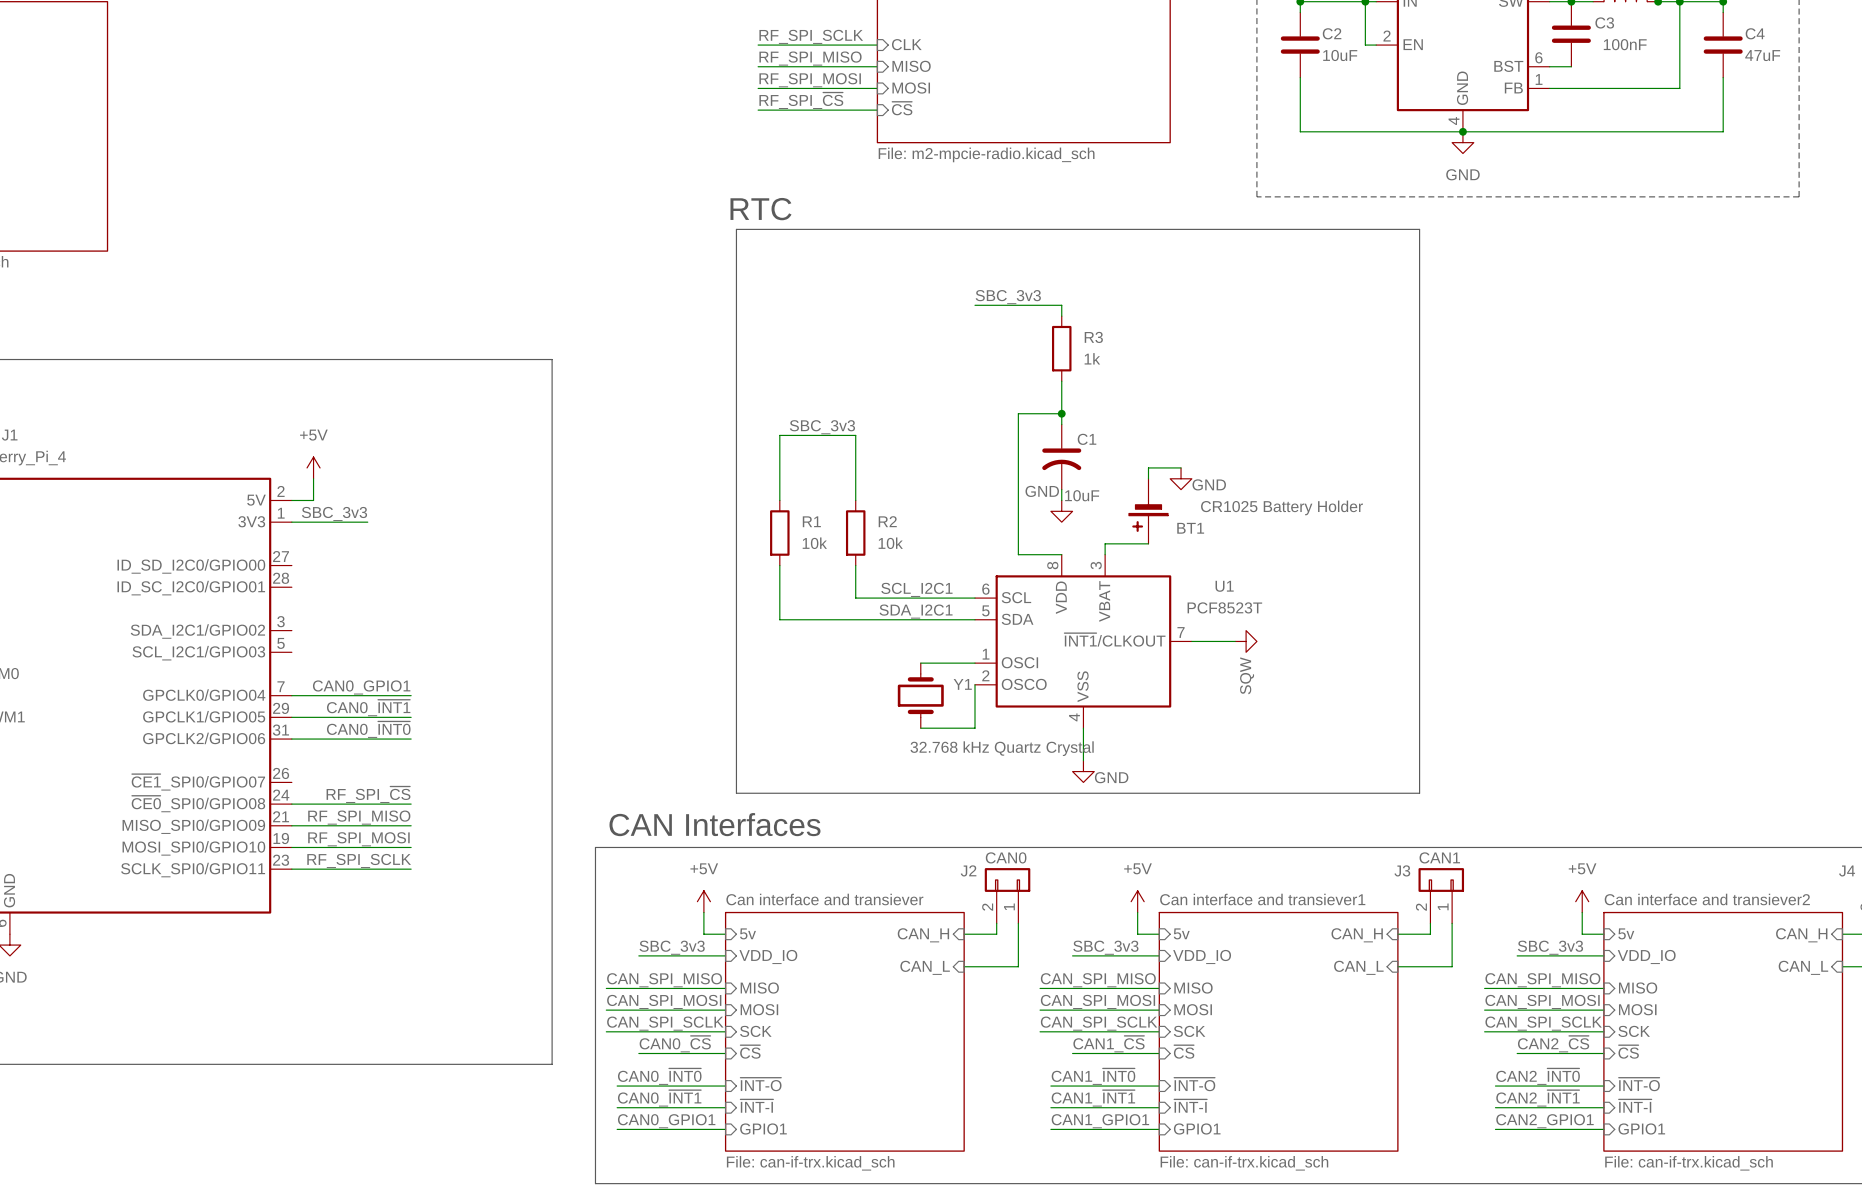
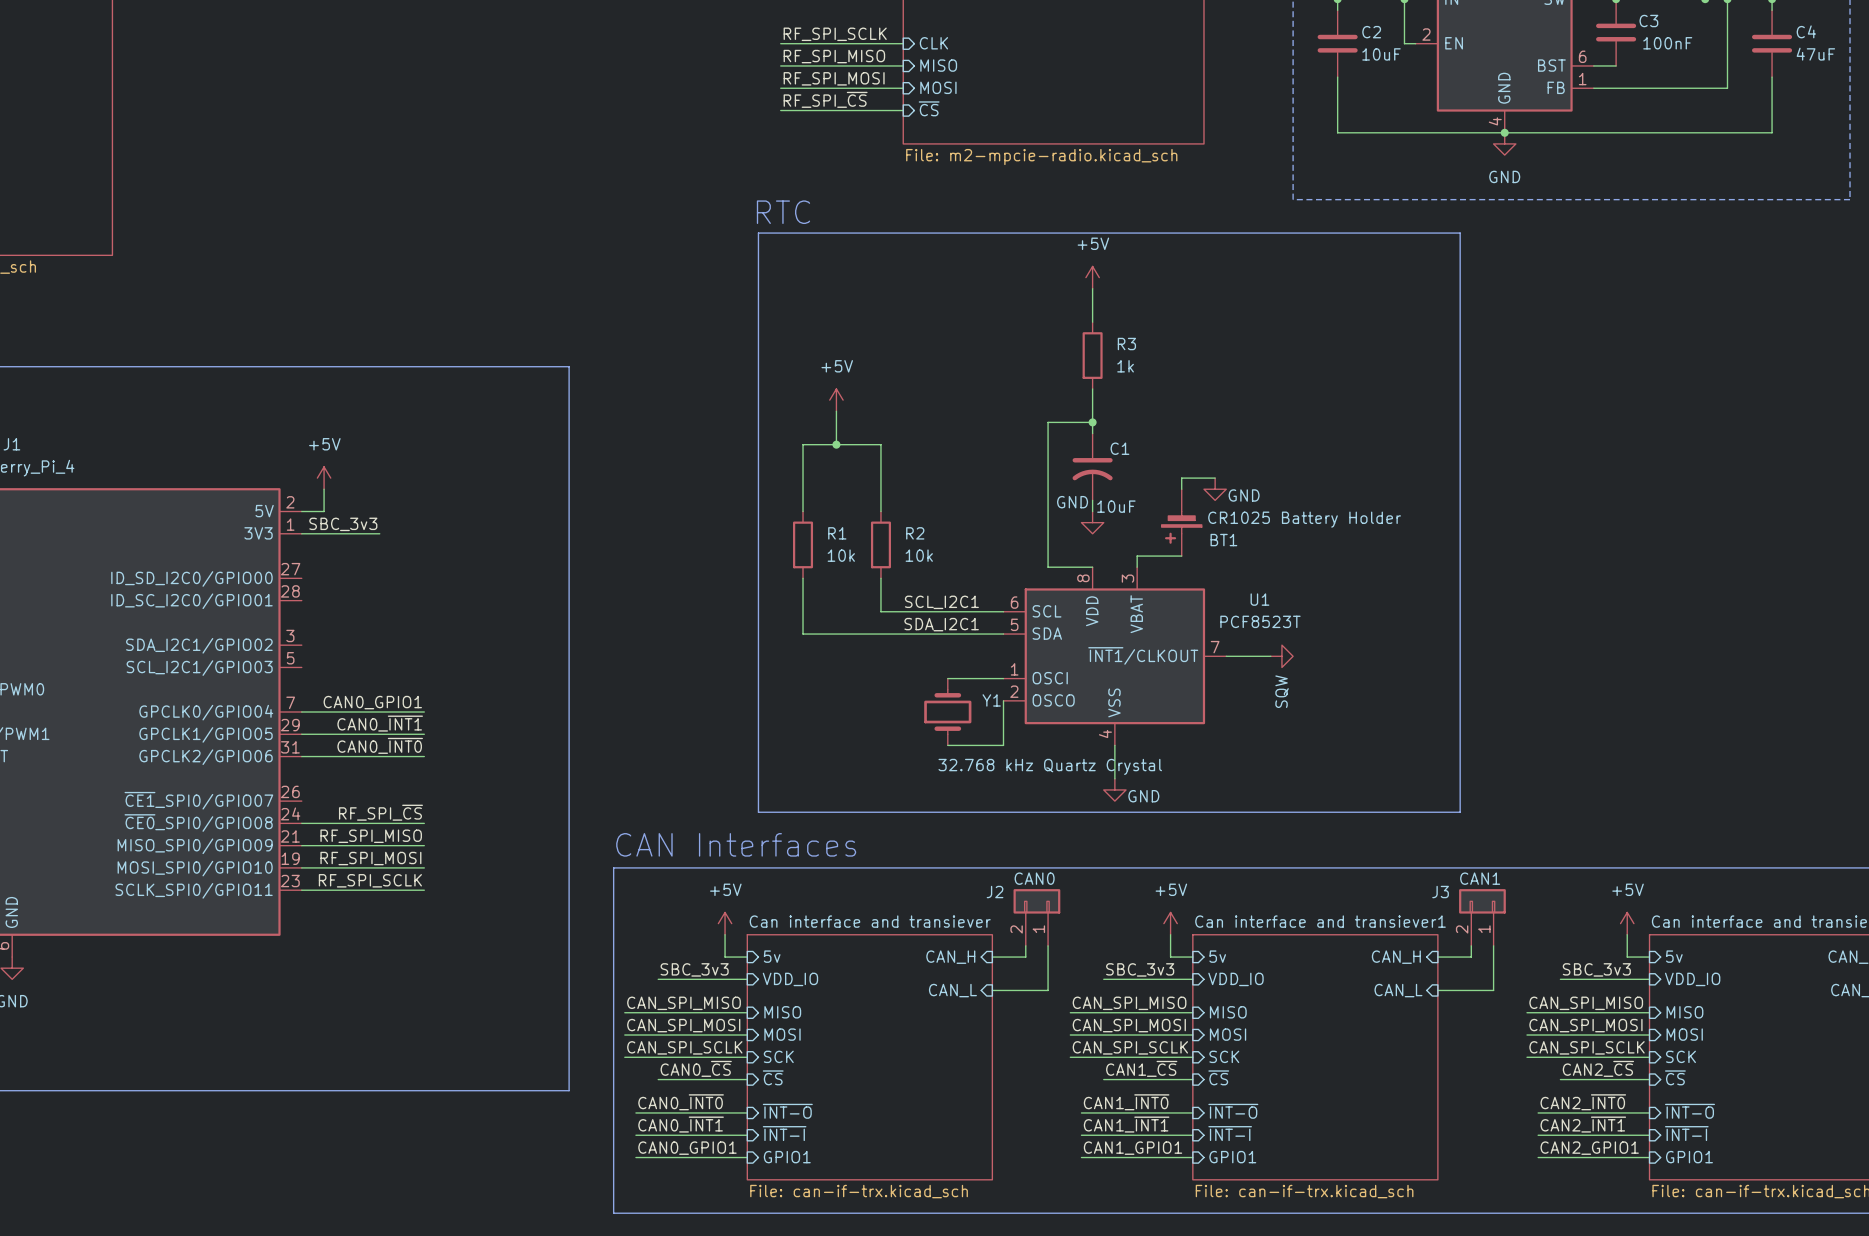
power symbol: none -> +5V (1092, 277)
label: SBC_3v3 (1008, 297) -> none
wire: (975, 305) (1061, 305) -> (1092, 288) (1092, 311)
power symbol: none -> +5V (836, 400)
wire: none -> (836, 411) (836, 444)
label: SBC_3v3 (822, 427) -> none
junction: none -> (836, 444)

